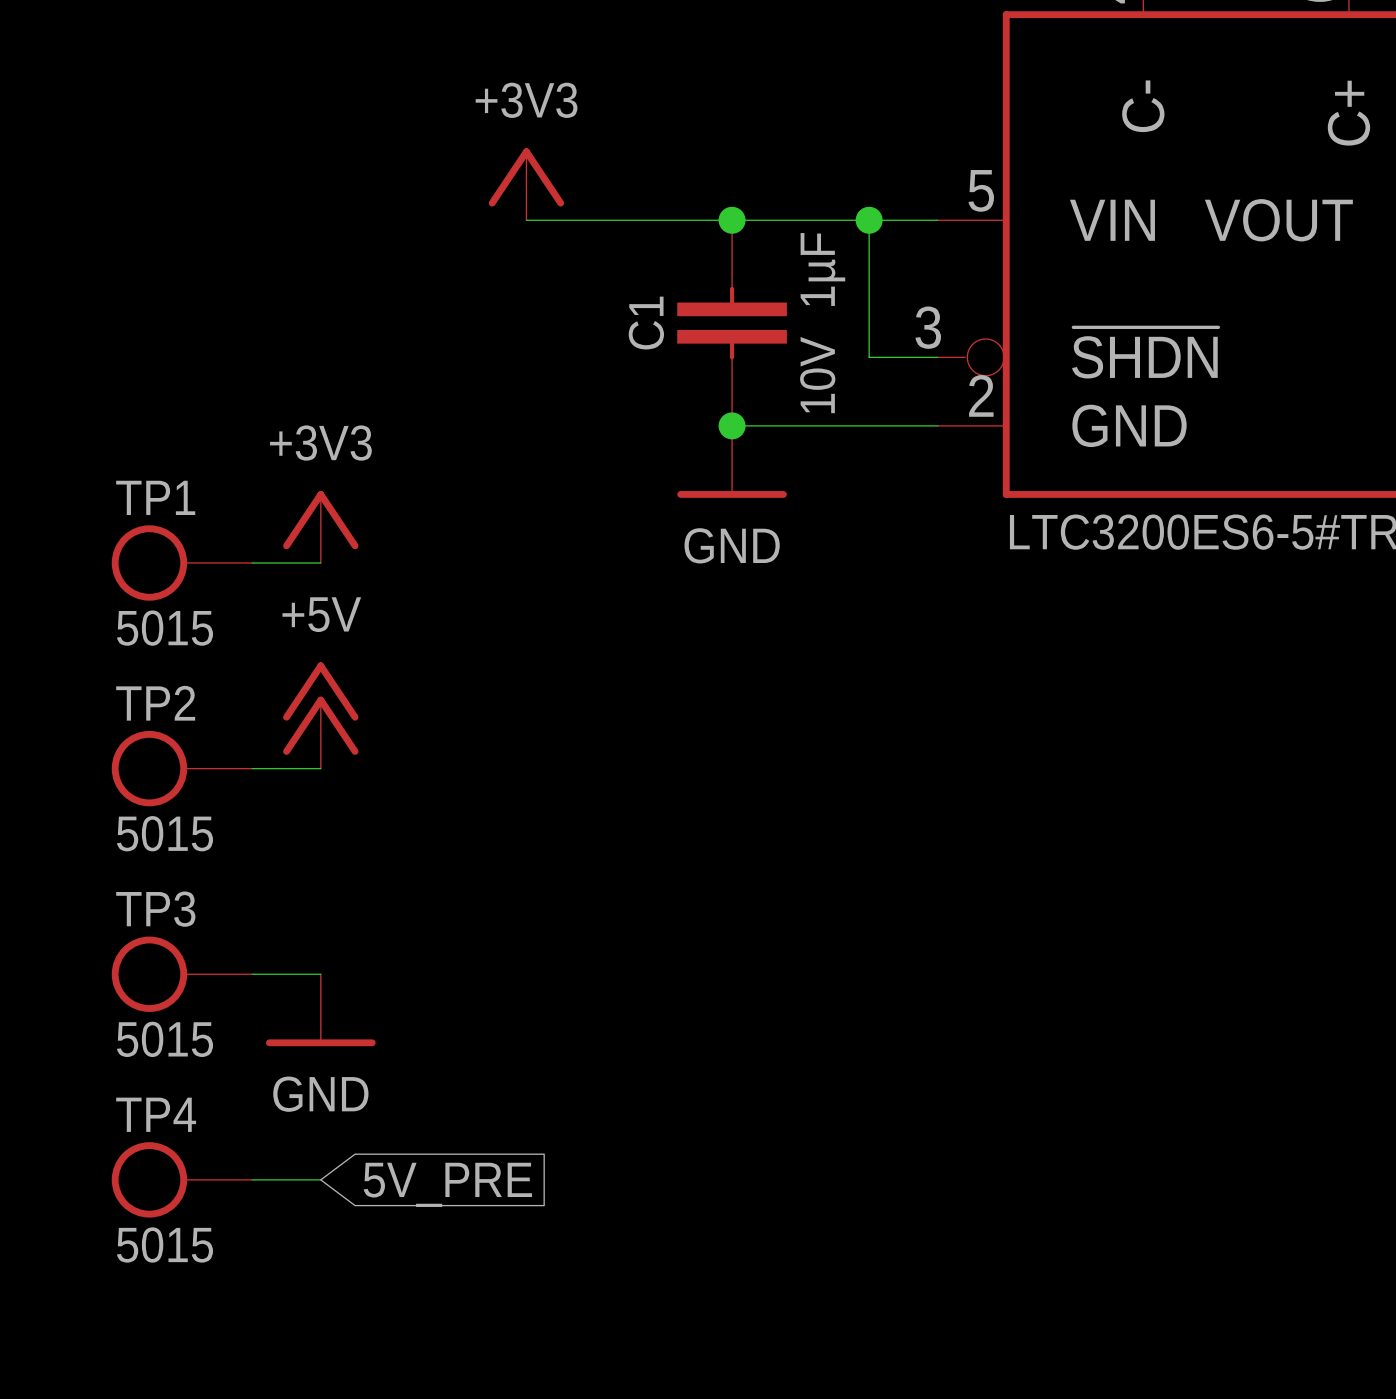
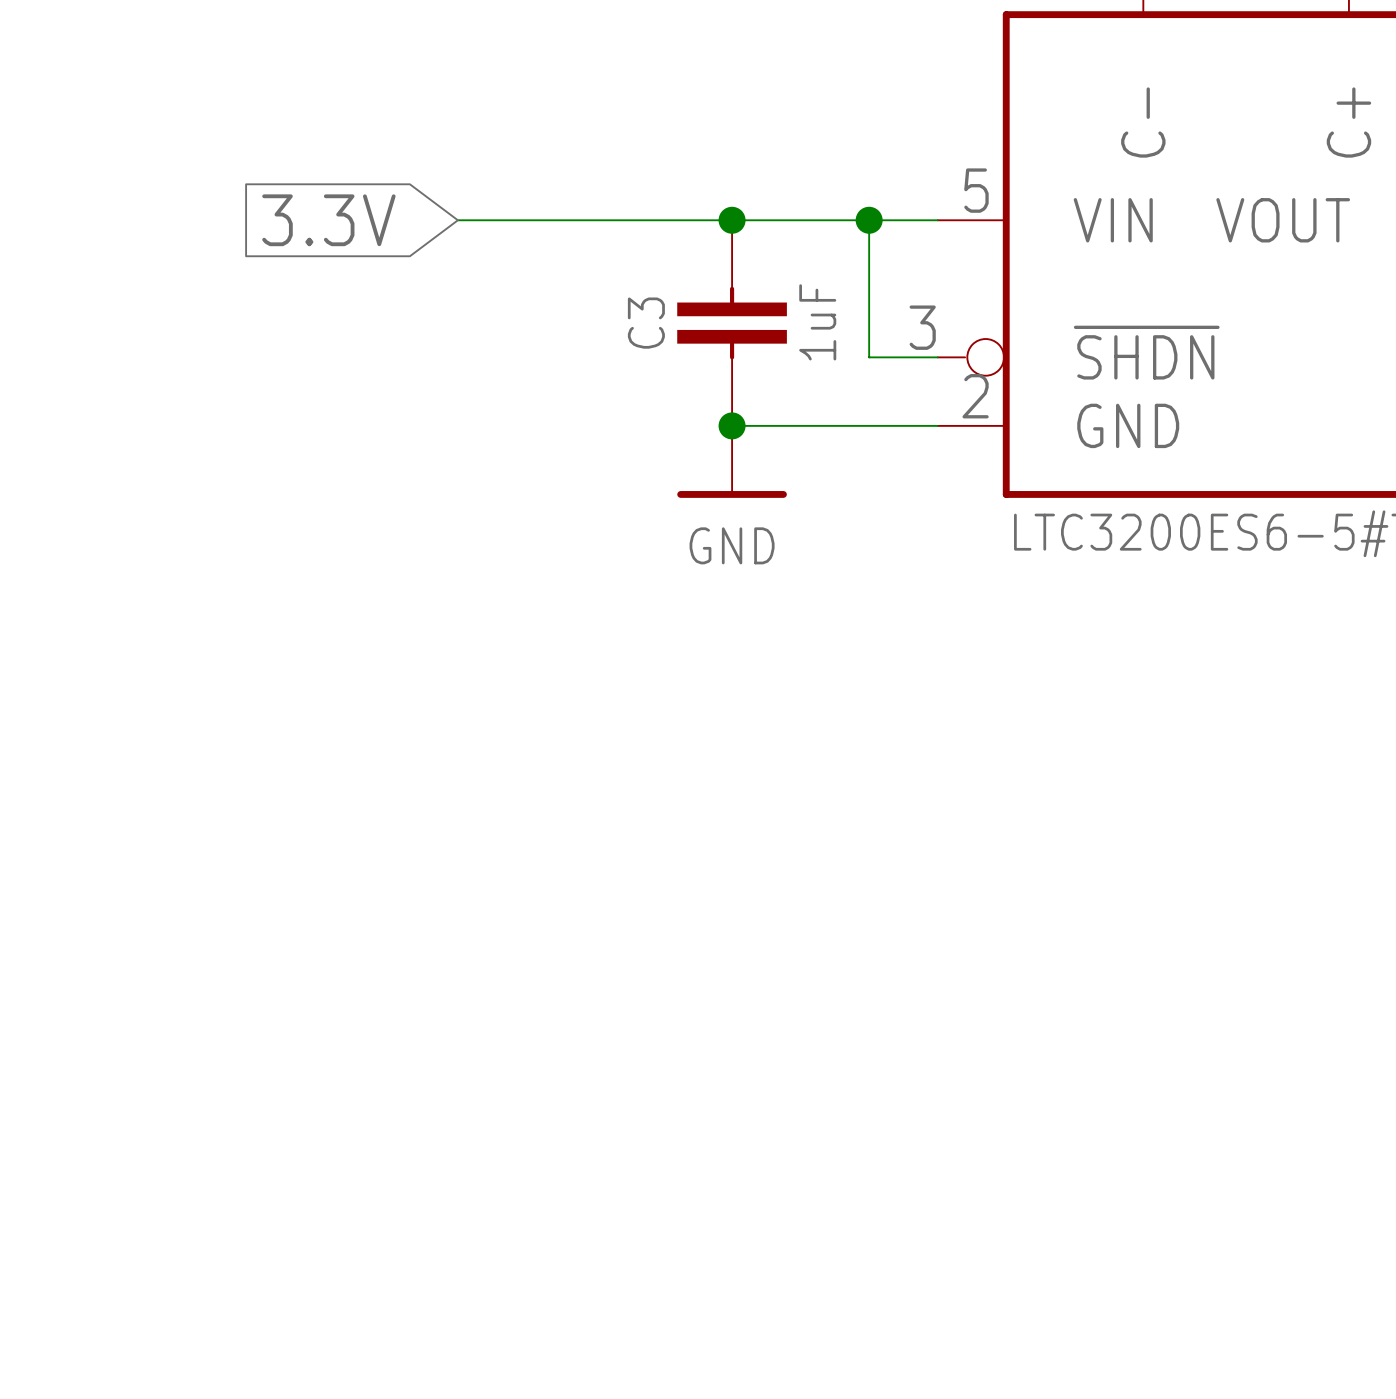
power symbol: +3V3 (526, 184) -> none
global label: none -> 3.3V (328, 220)
C1 text: 1µF (822, 269) -> none
C1 value: none -> 1uF (817, 322)
C1 name: C1 (646, 323) -> C3 (646, 323)
C1 text: 10V (817, 375) -> none
power symbol: +3V3 (320, 527) -> none
TP1: (182, 562) -> none
wire: (252, 562) (320, 562) -> (457, 220) (526, 220)
power symbol: +5V (320, 715) -> none
TP2: (182, 768) -> none
wire: (252, 768) (320, 768) -> none
TP3: (182, 974) -> none
wire: (252, 974) (320, 974) -> none
power symbol: GND (320, 1010) -> none
TP4: (182, 1179) -> none
wire: (252, 1179) (320, 1179) -> none
global label: 5V_PRE (447, 1184) -> none

